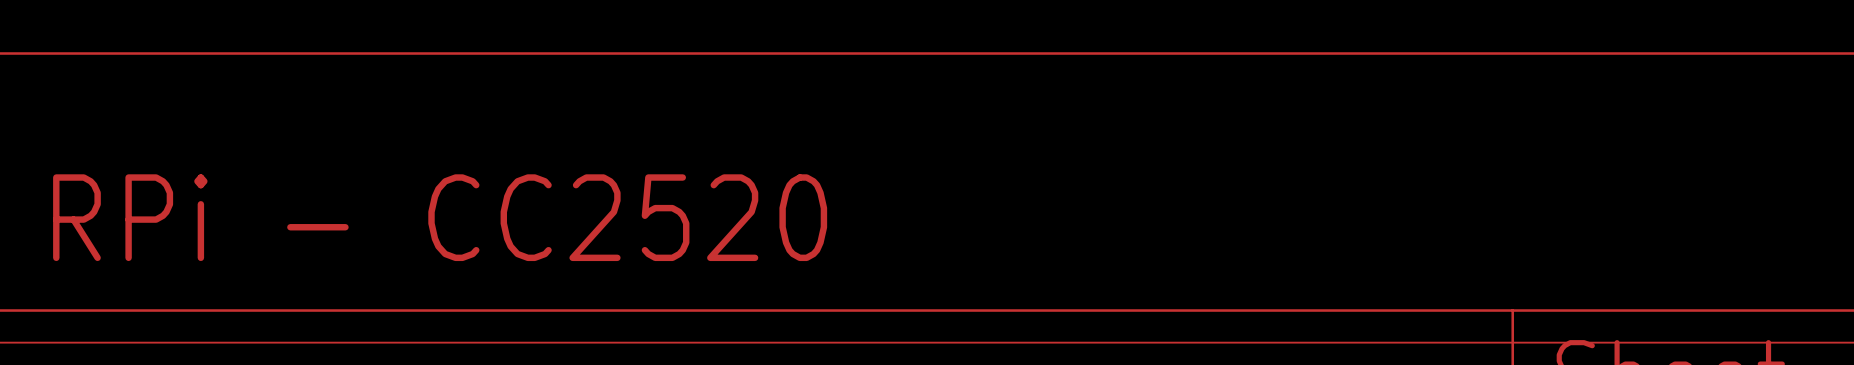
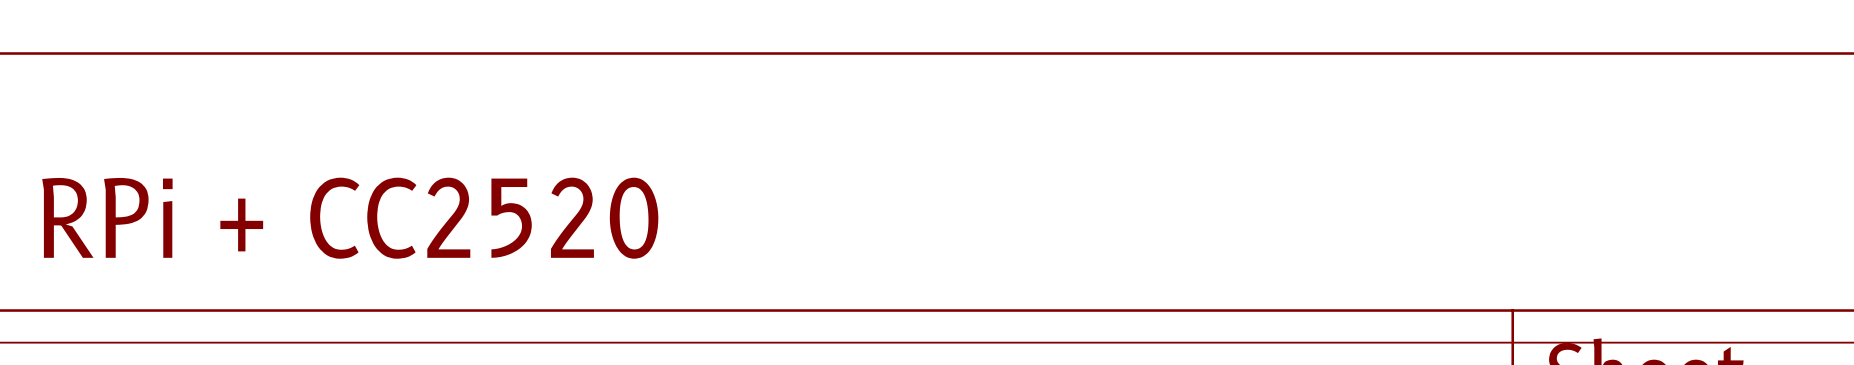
part text: RPi - CC2520 (440, 217) -> RPi + CC2520 (350, 218)

